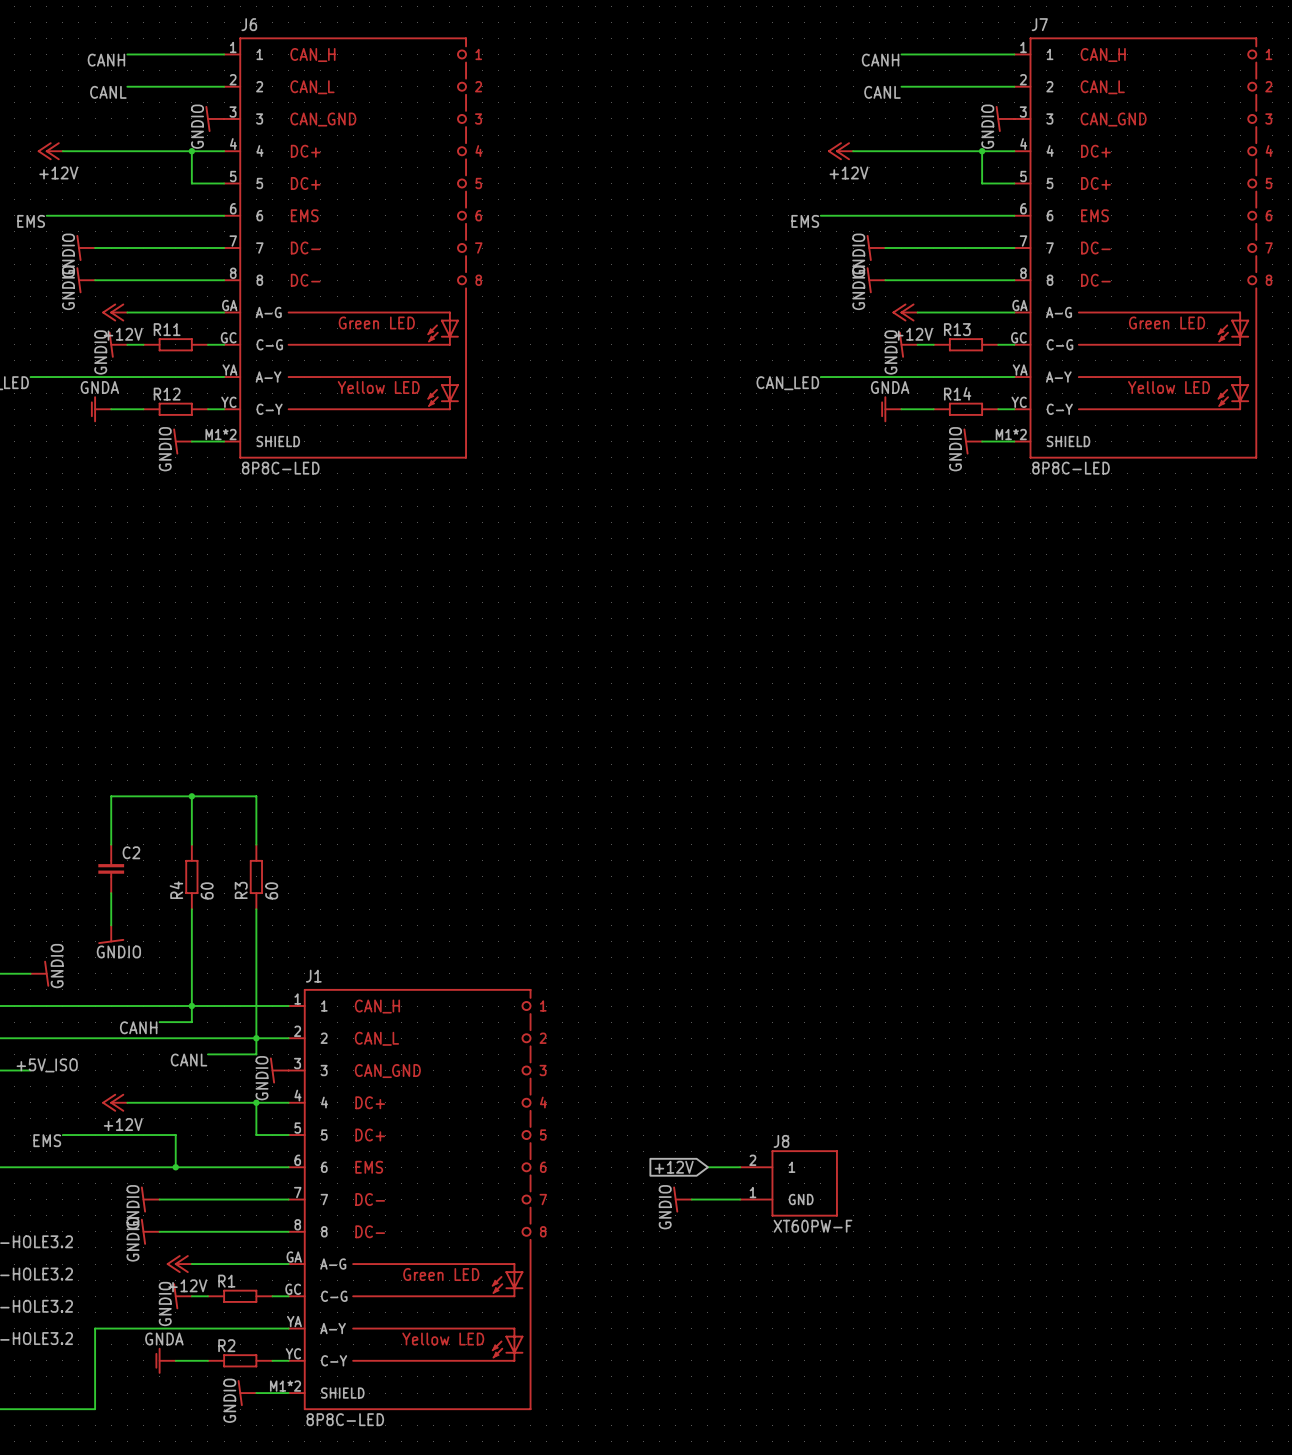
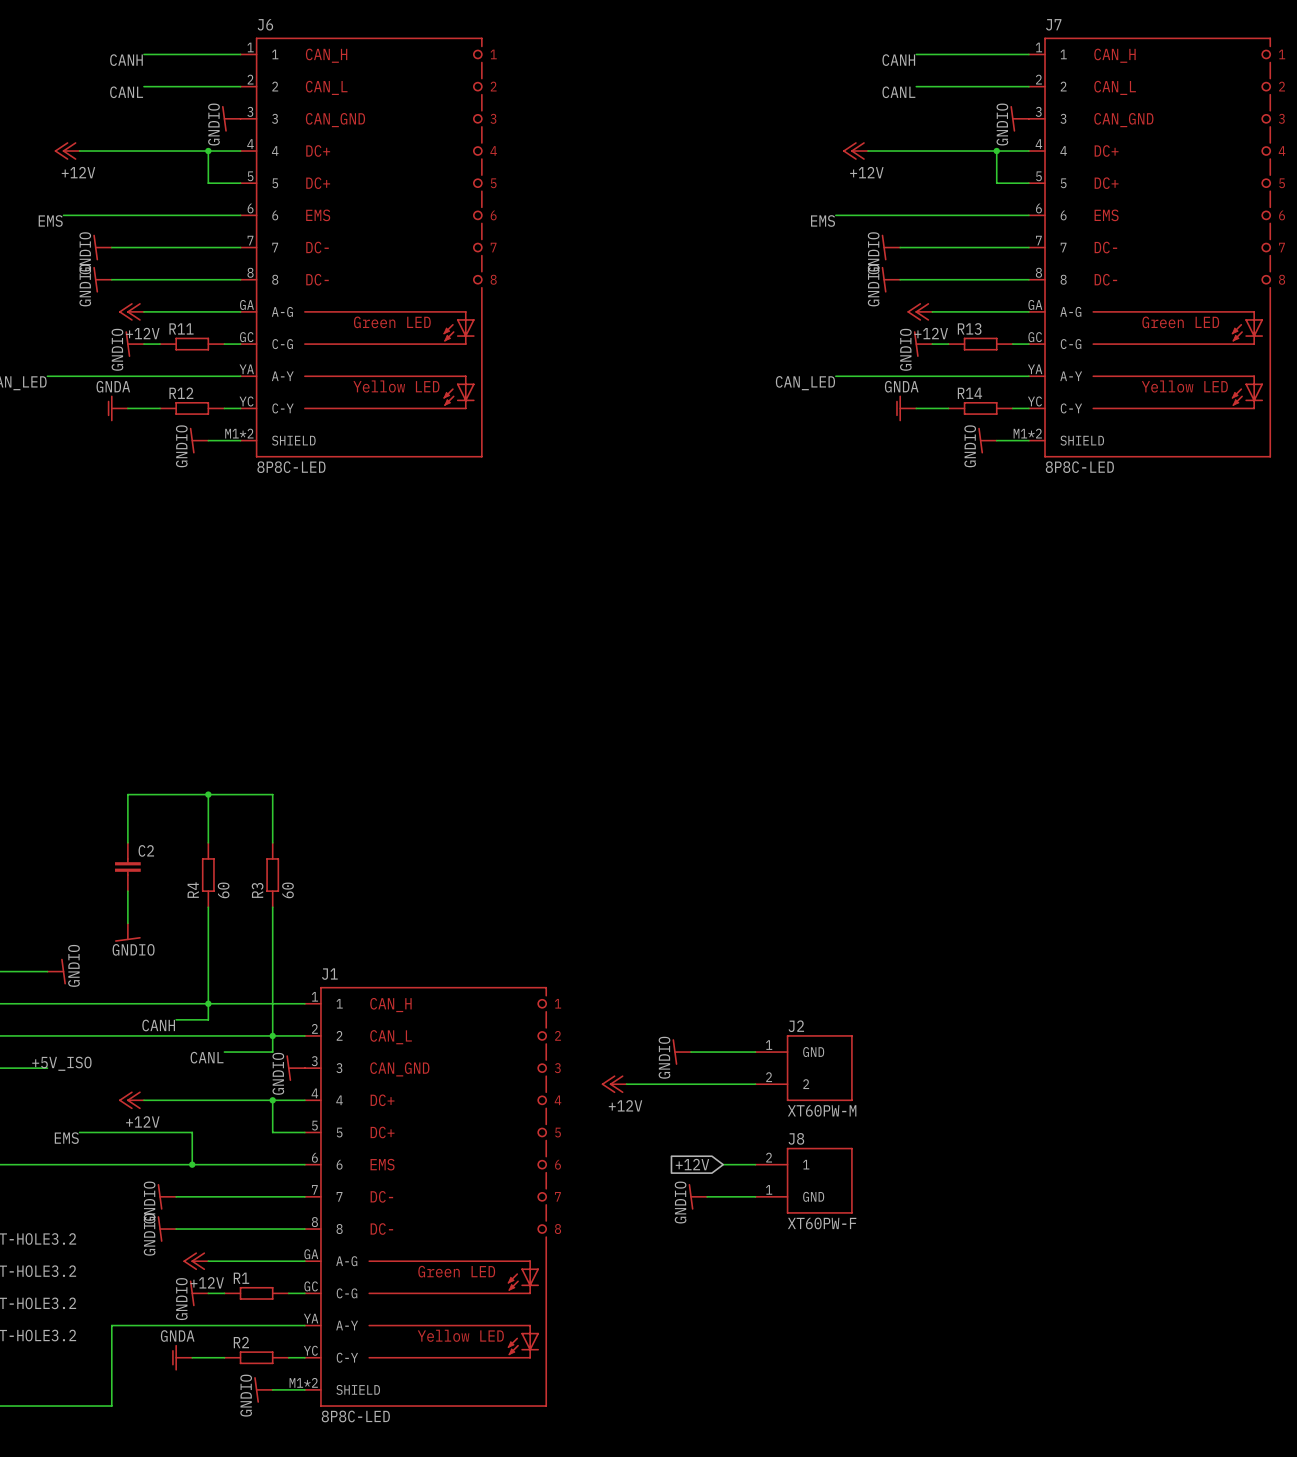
power symbol: none -> GNDIO (681, 1052)
wire: none -> (691, 1052) (755, 1052)
J2: none -> XT60PW-M (804, 1068)
power symbol: none -> +12V (614, 1084)
wire: none -> (626, 1084) (755, 1084)

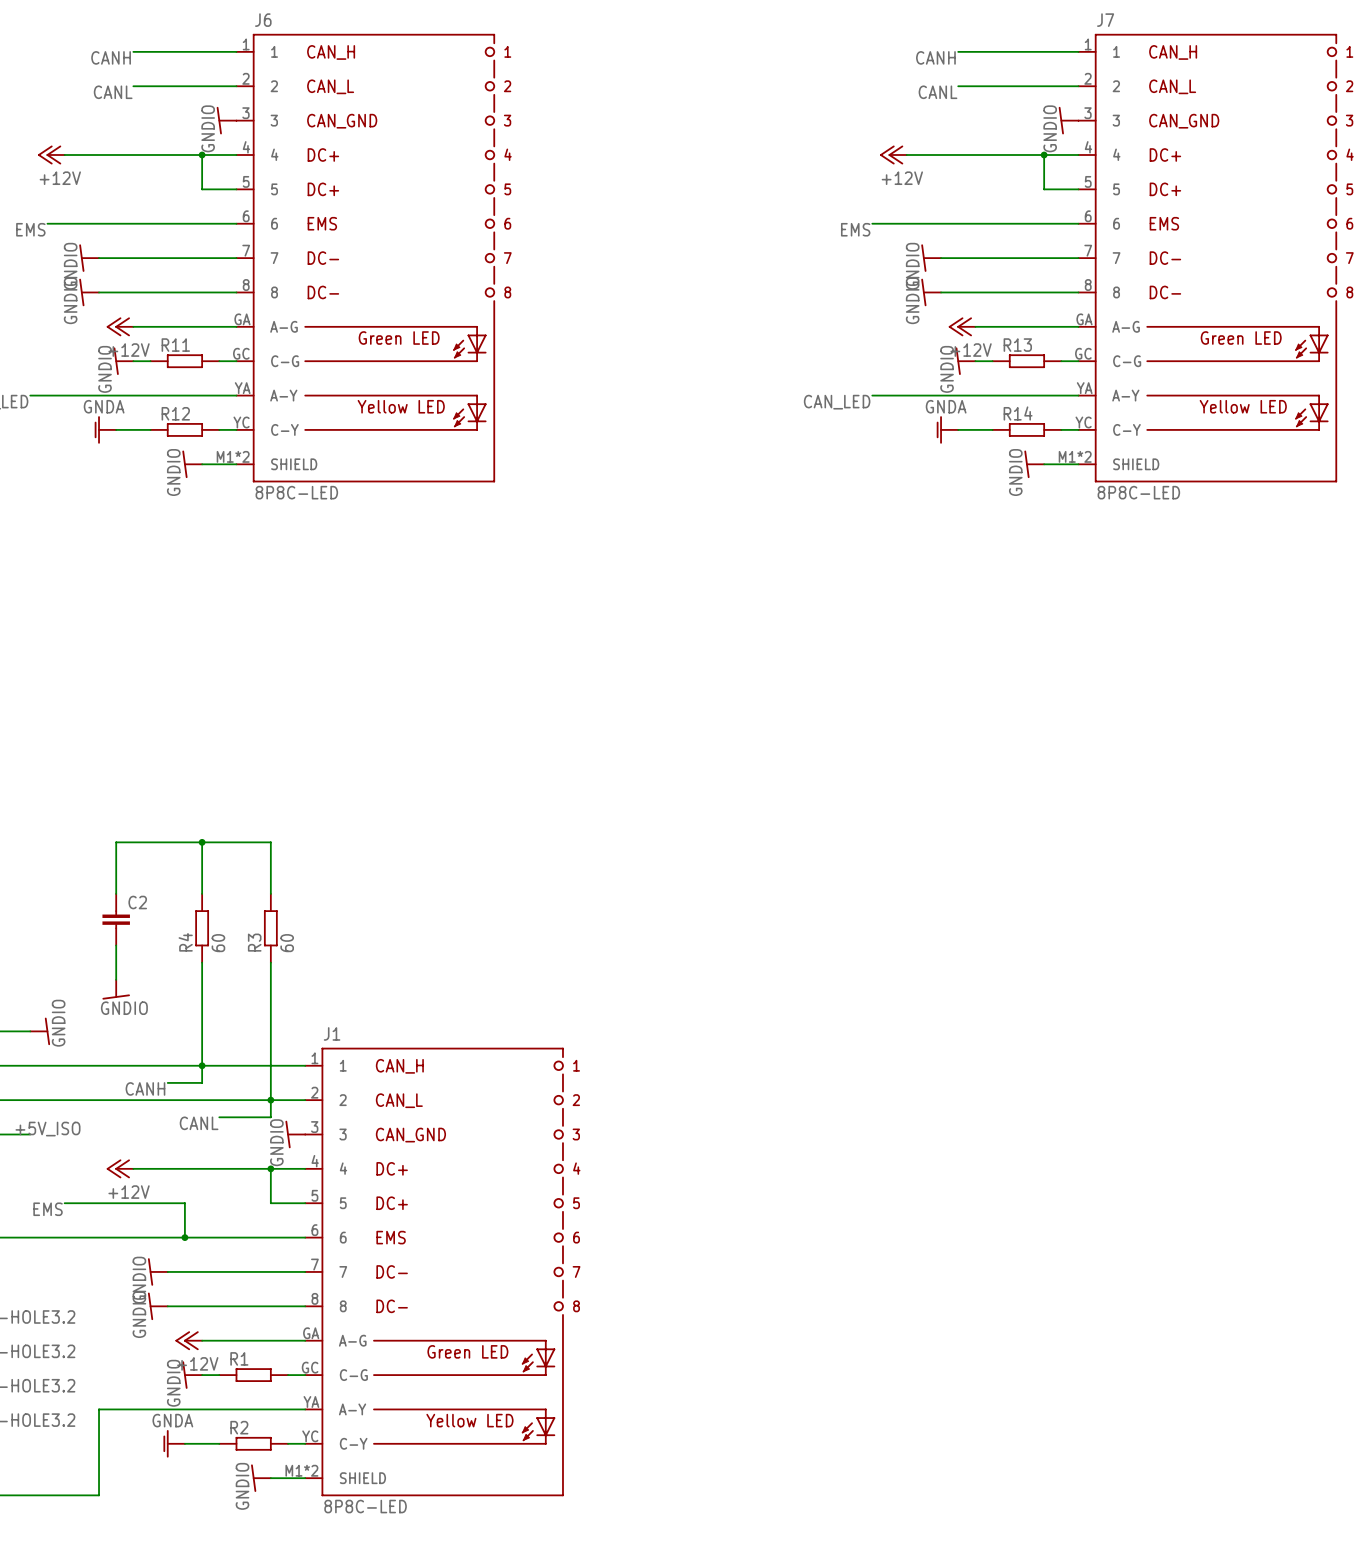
power symbol: GNDIO (681, 1052) -> none
wire: (691, 1052) (755, 1052) -> none
J2: XT60PW-M (804, 1068) -> none
power symbol: +12V (614, 1084) -> none
wire: (626, 1084) (755, 1084) -> none
global label: +12V (692, 1164) -> none
wire: (723, 1164) (755, 1164) -> none
J8: XT60PW-F (804, 1180) -> none
power symbol: GNDIO (697, 1196) -> none
wire: (707, 1196) (755, 1196) -> none

